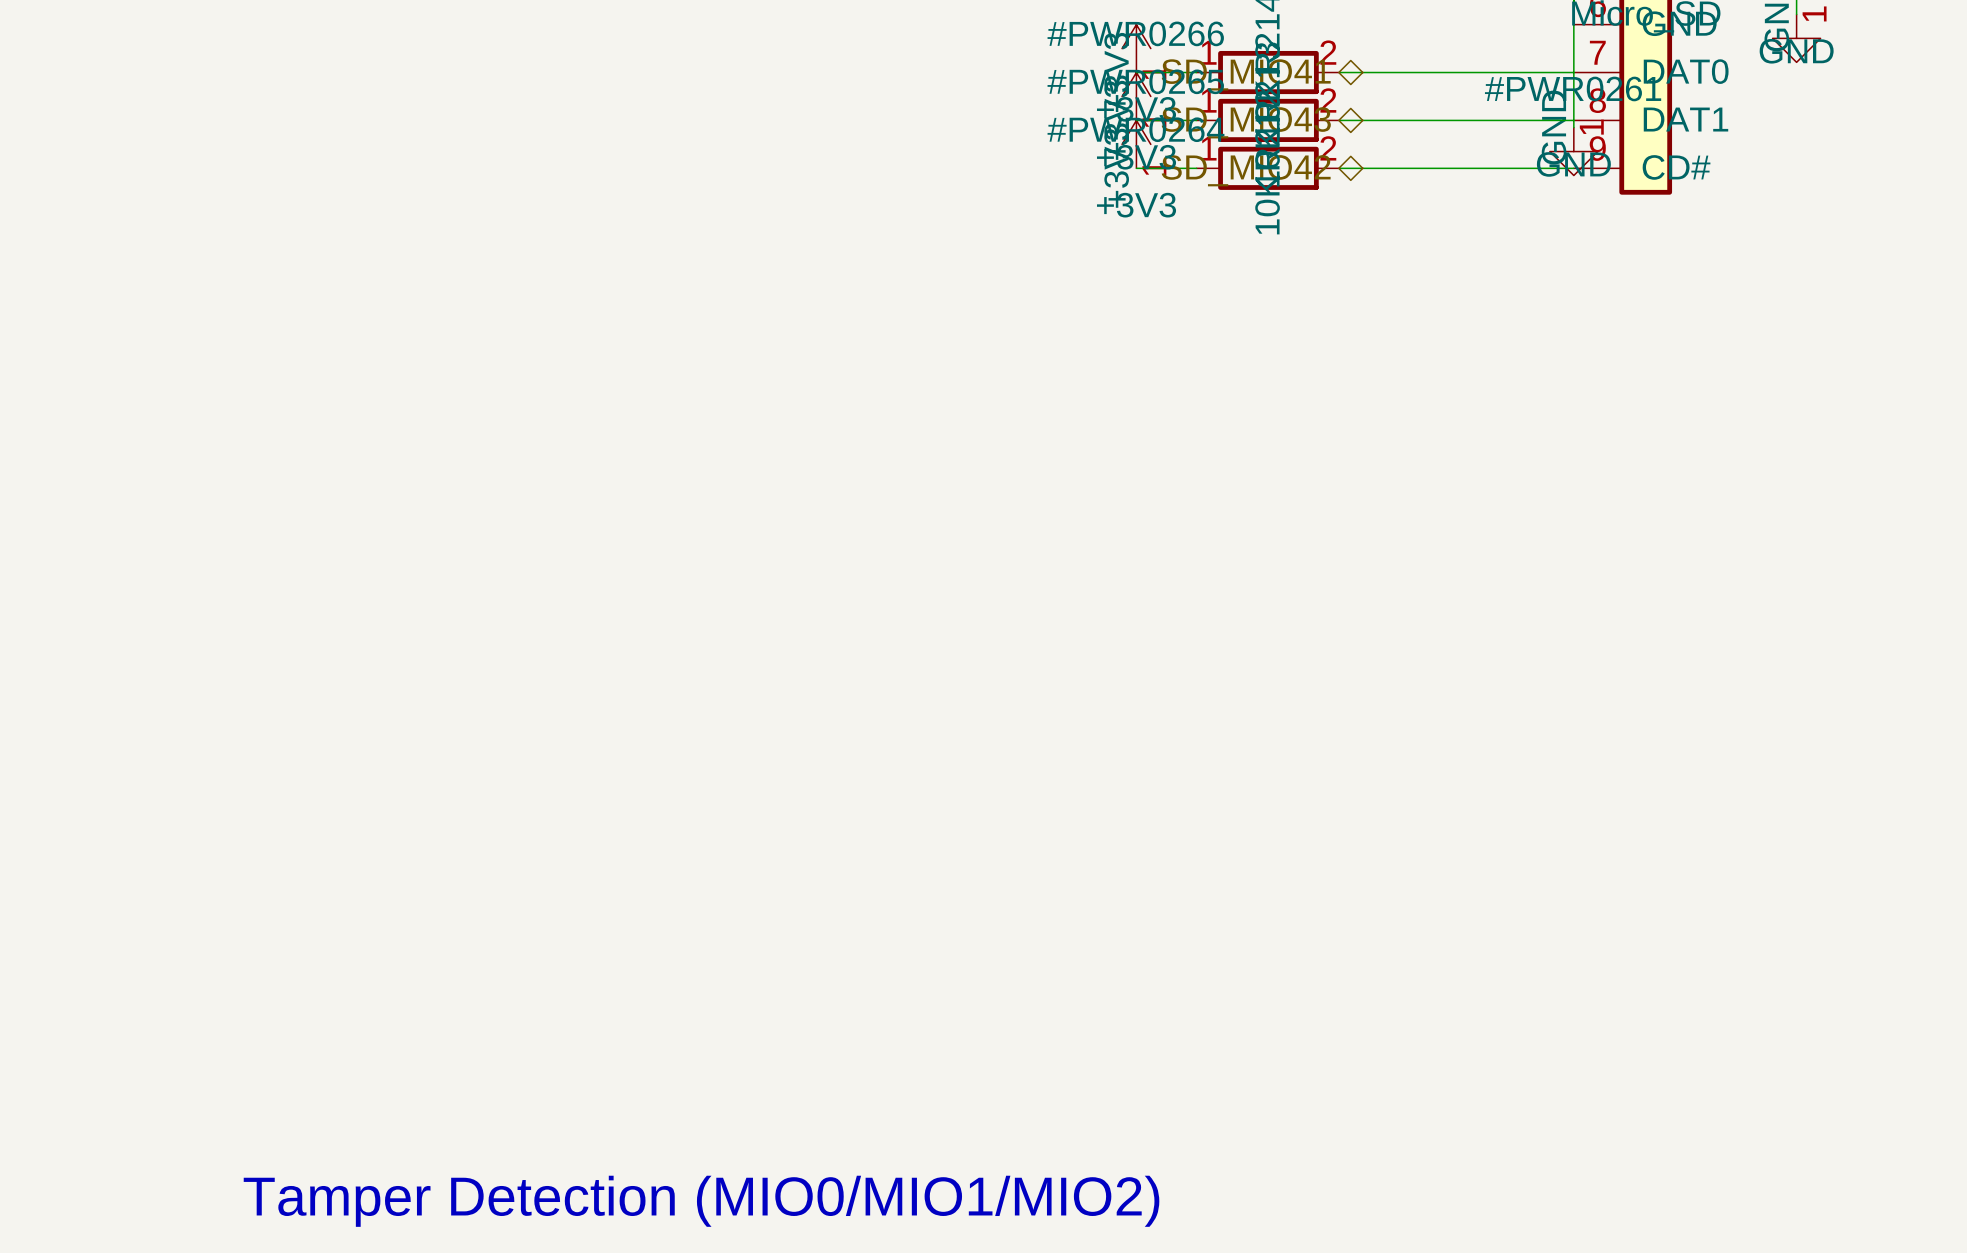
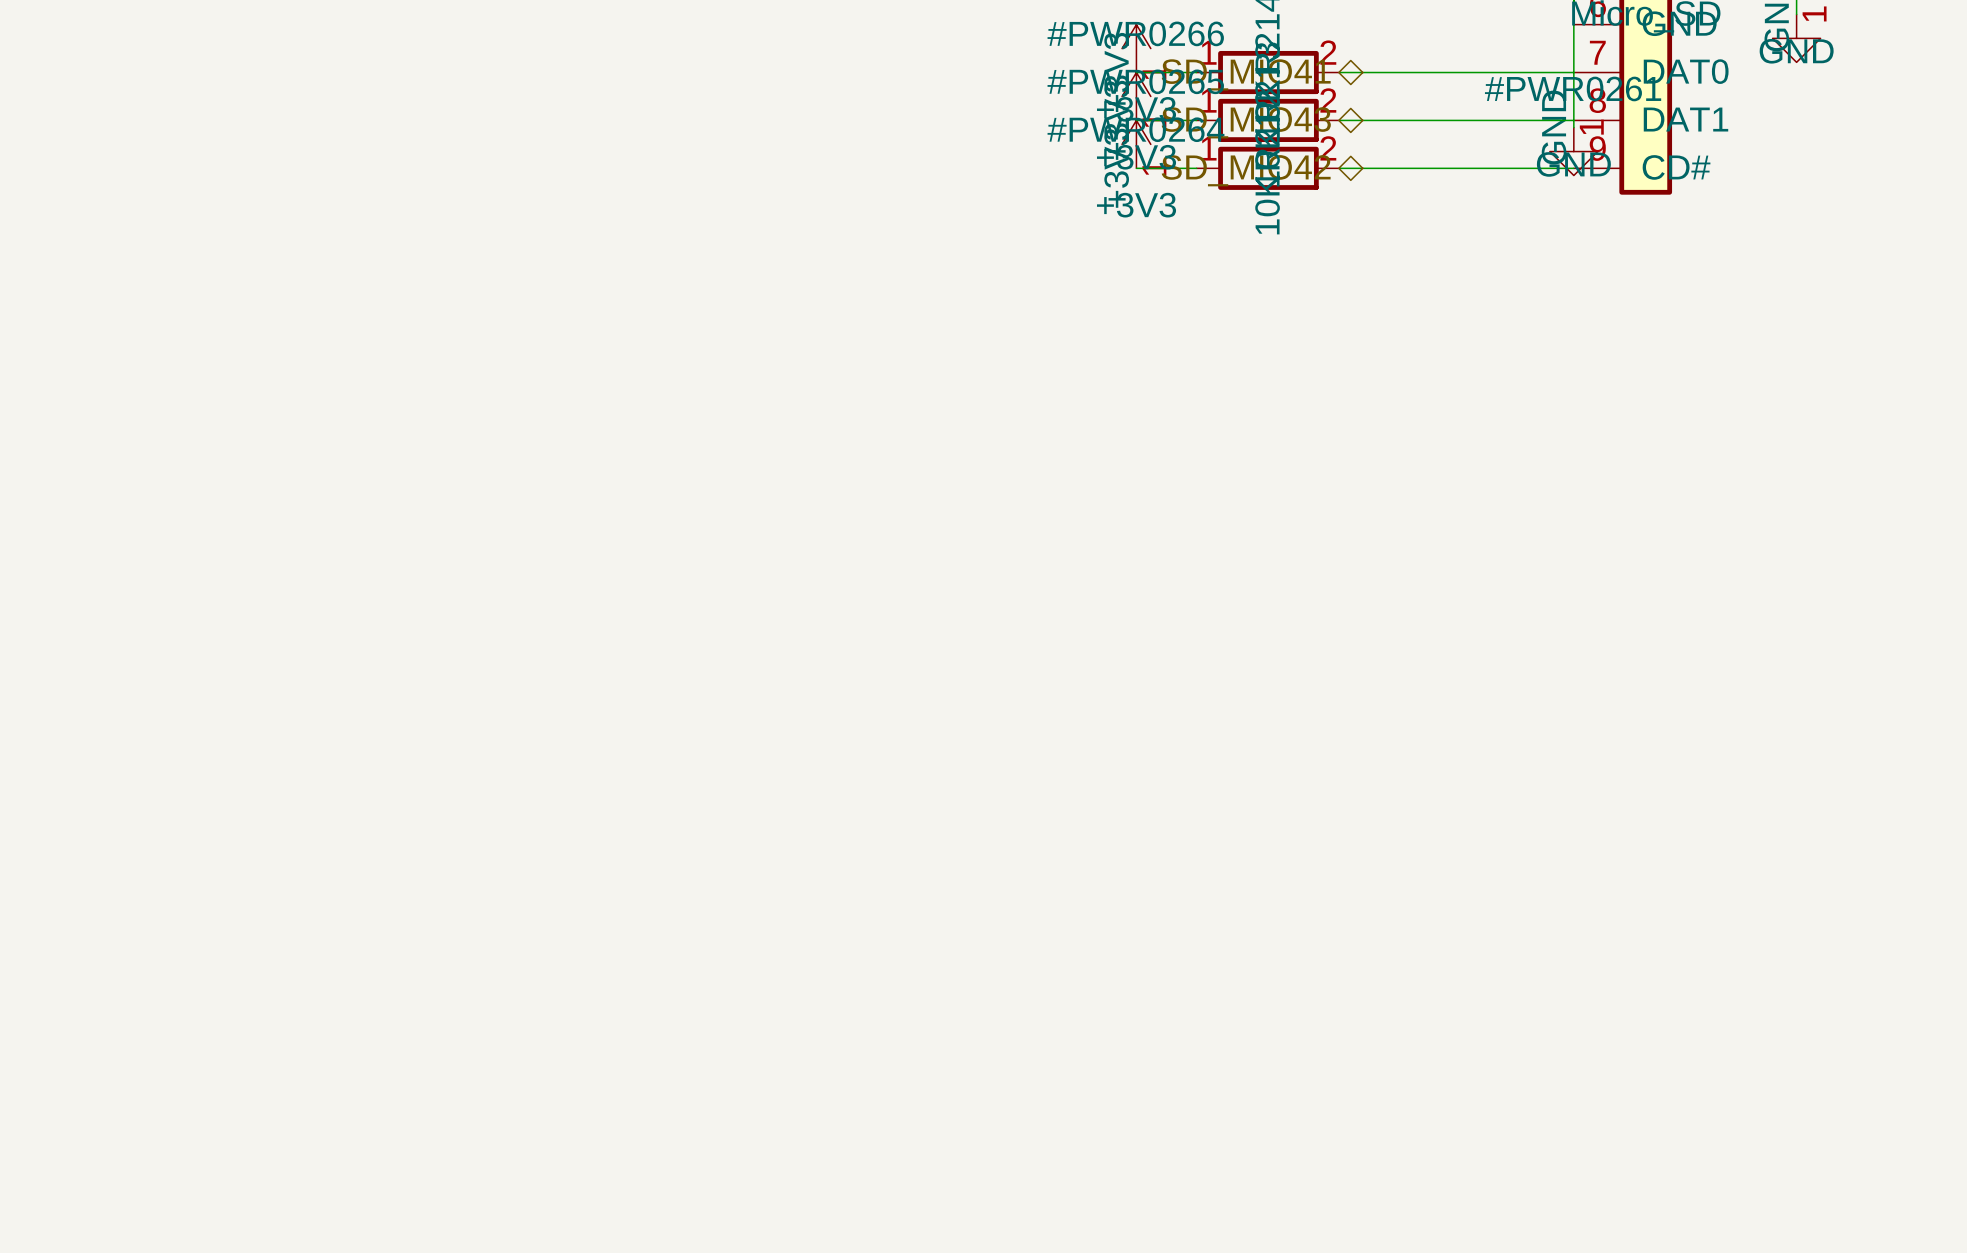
text: Tamper Detection (MIO0/MIO1/MIO2) (701, 1201) -> none

